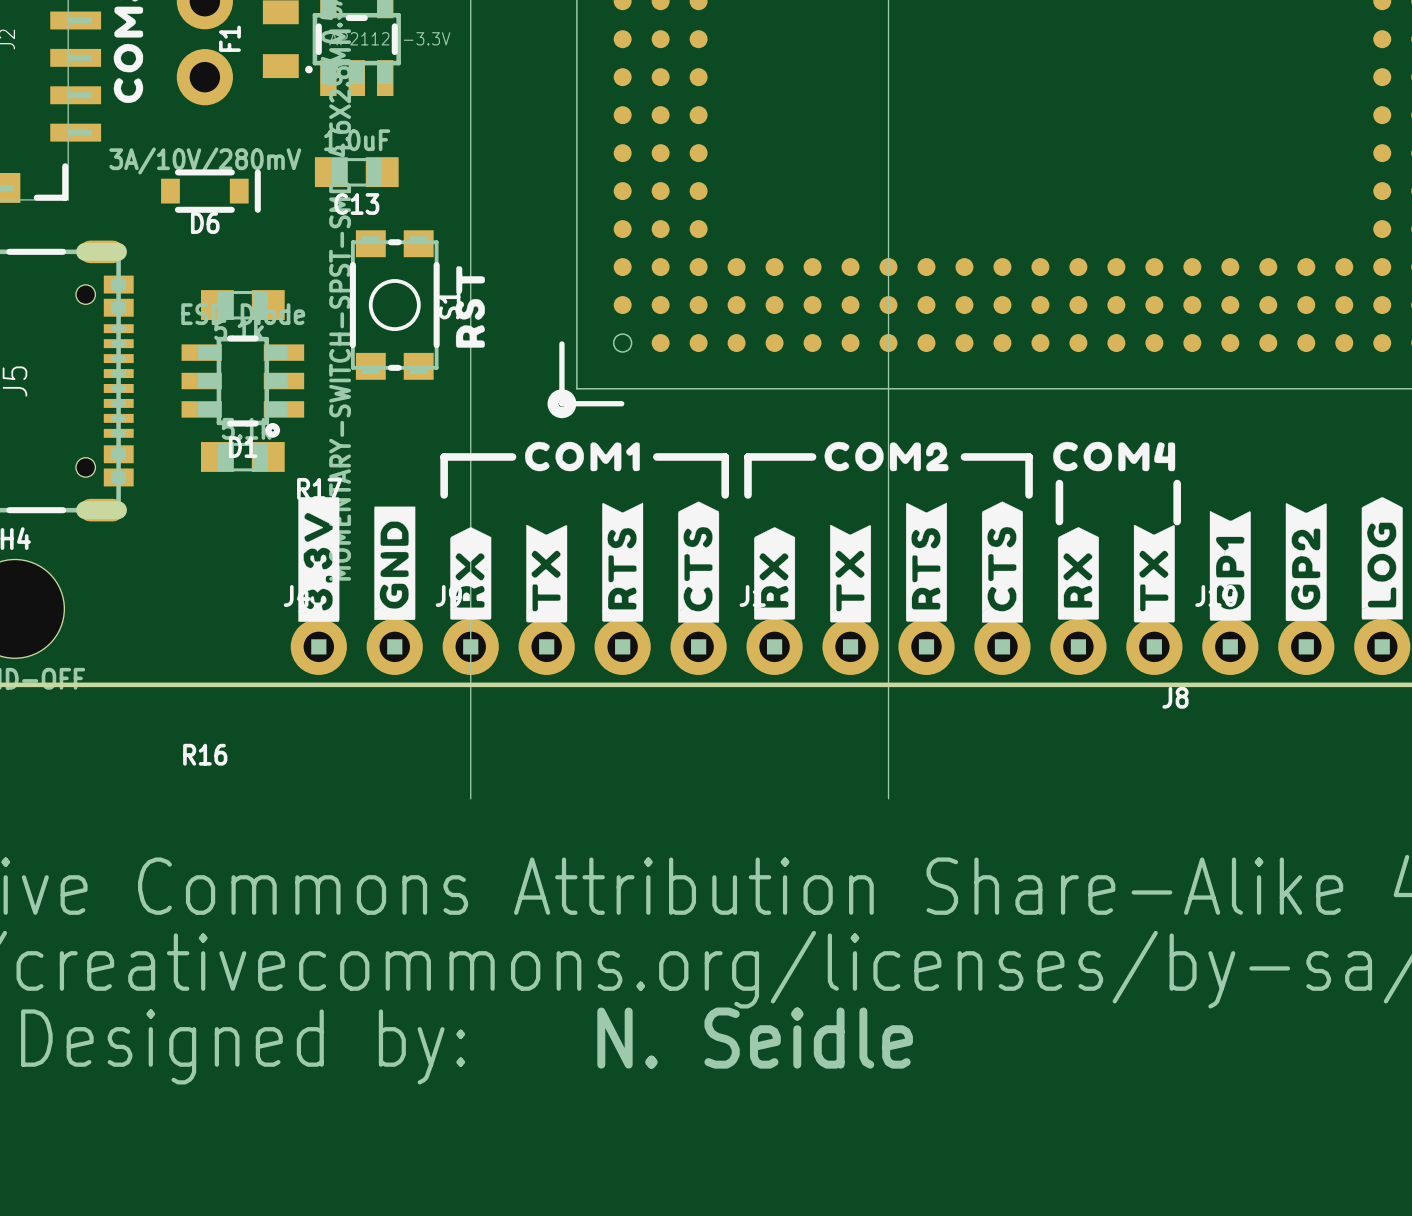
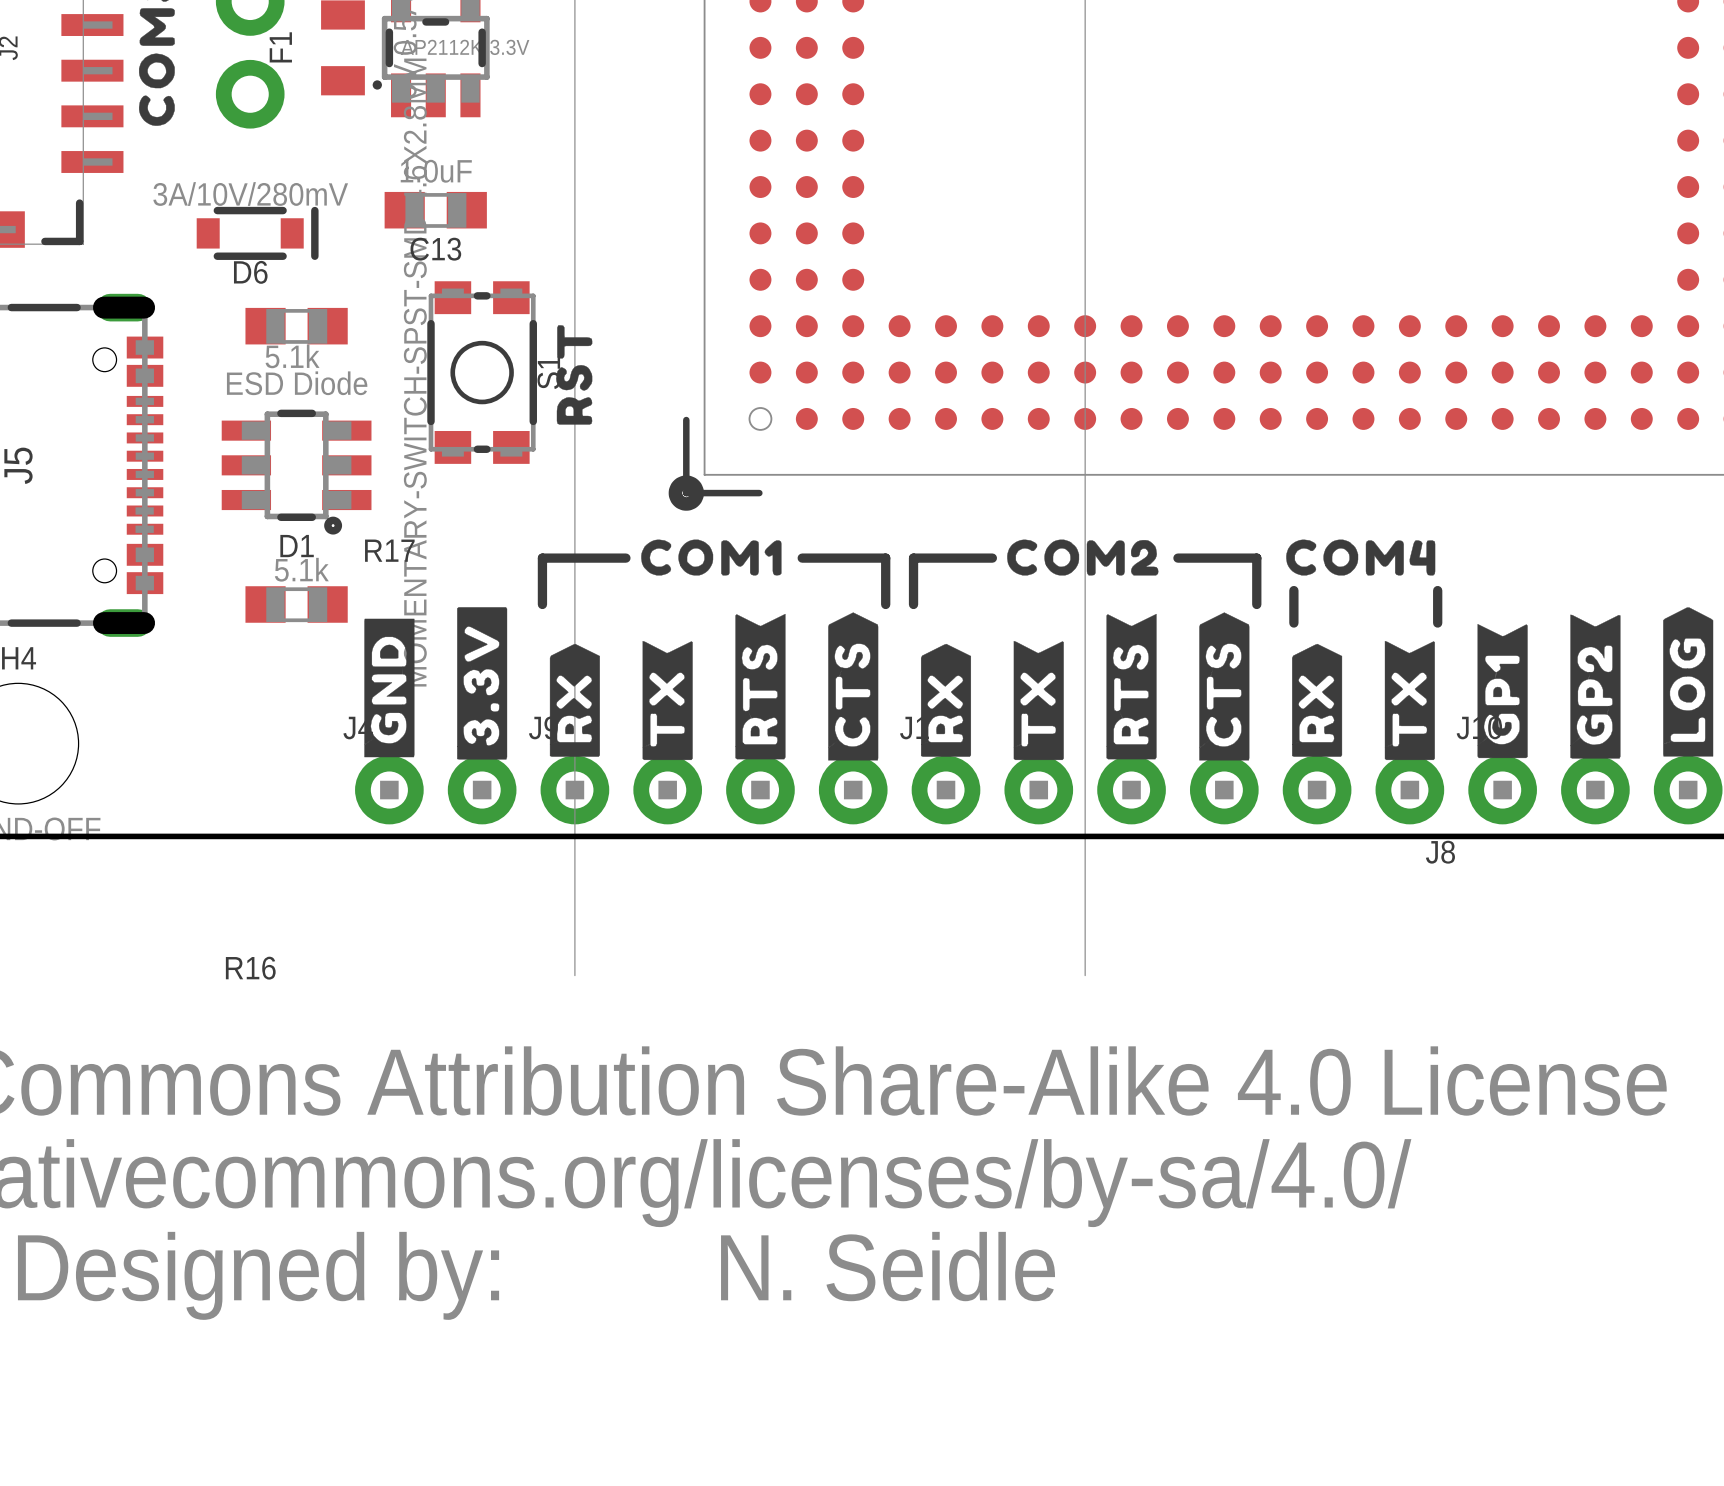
R17 position: (242, 305) -> (296, 326)
R16 position: (242, 456) -> (296, 604)
line: (1059, 510) (1059, 521) -> none
line: (1177, 510) (1177, 521) -> none
drawing position: (318, 559) -> (482, 683)
drawing position: (394, 563) -> (389, 687)

